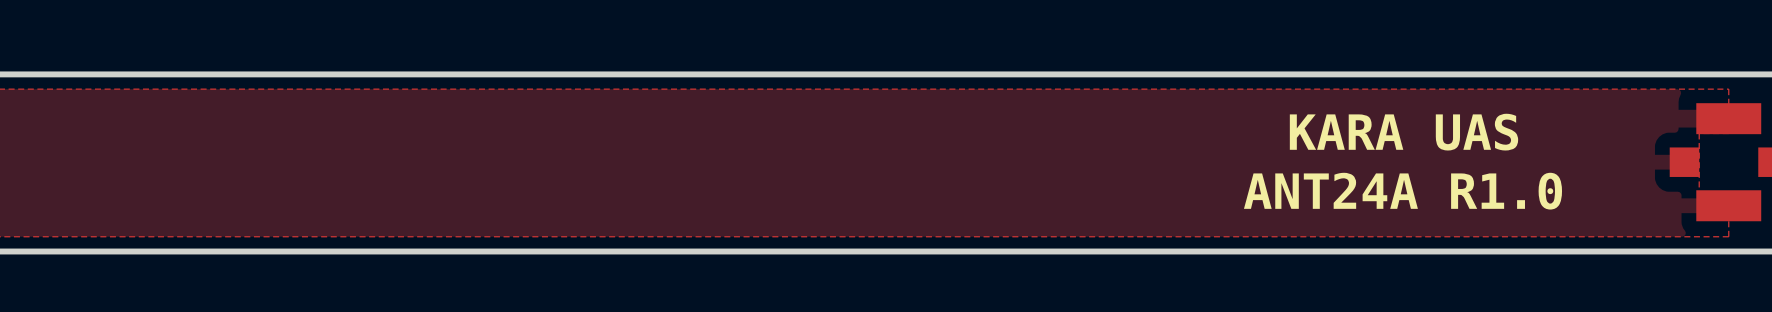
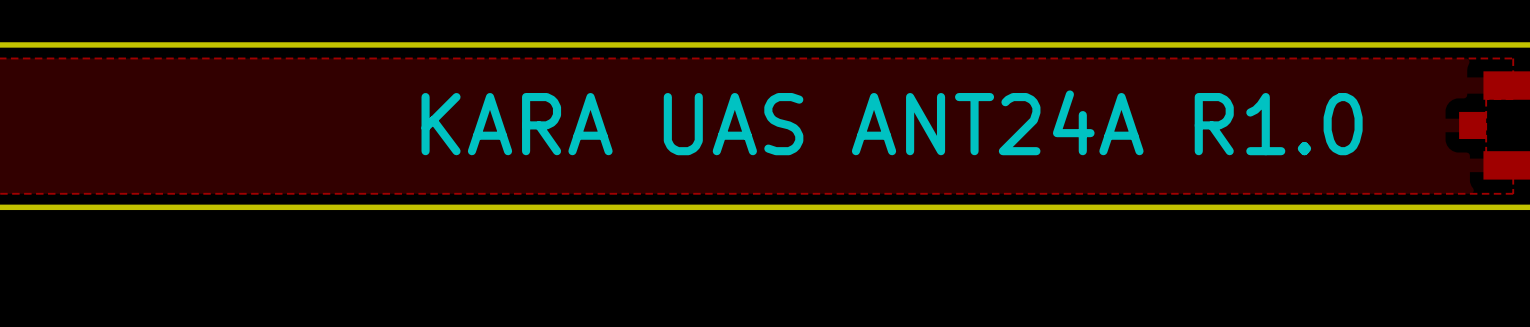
text: KARA UAS (1403, 132) -> none
text: ANT24A R1.0 (1402, 191) -> KARA UAS ANT24A R1.0 (892, 122)

